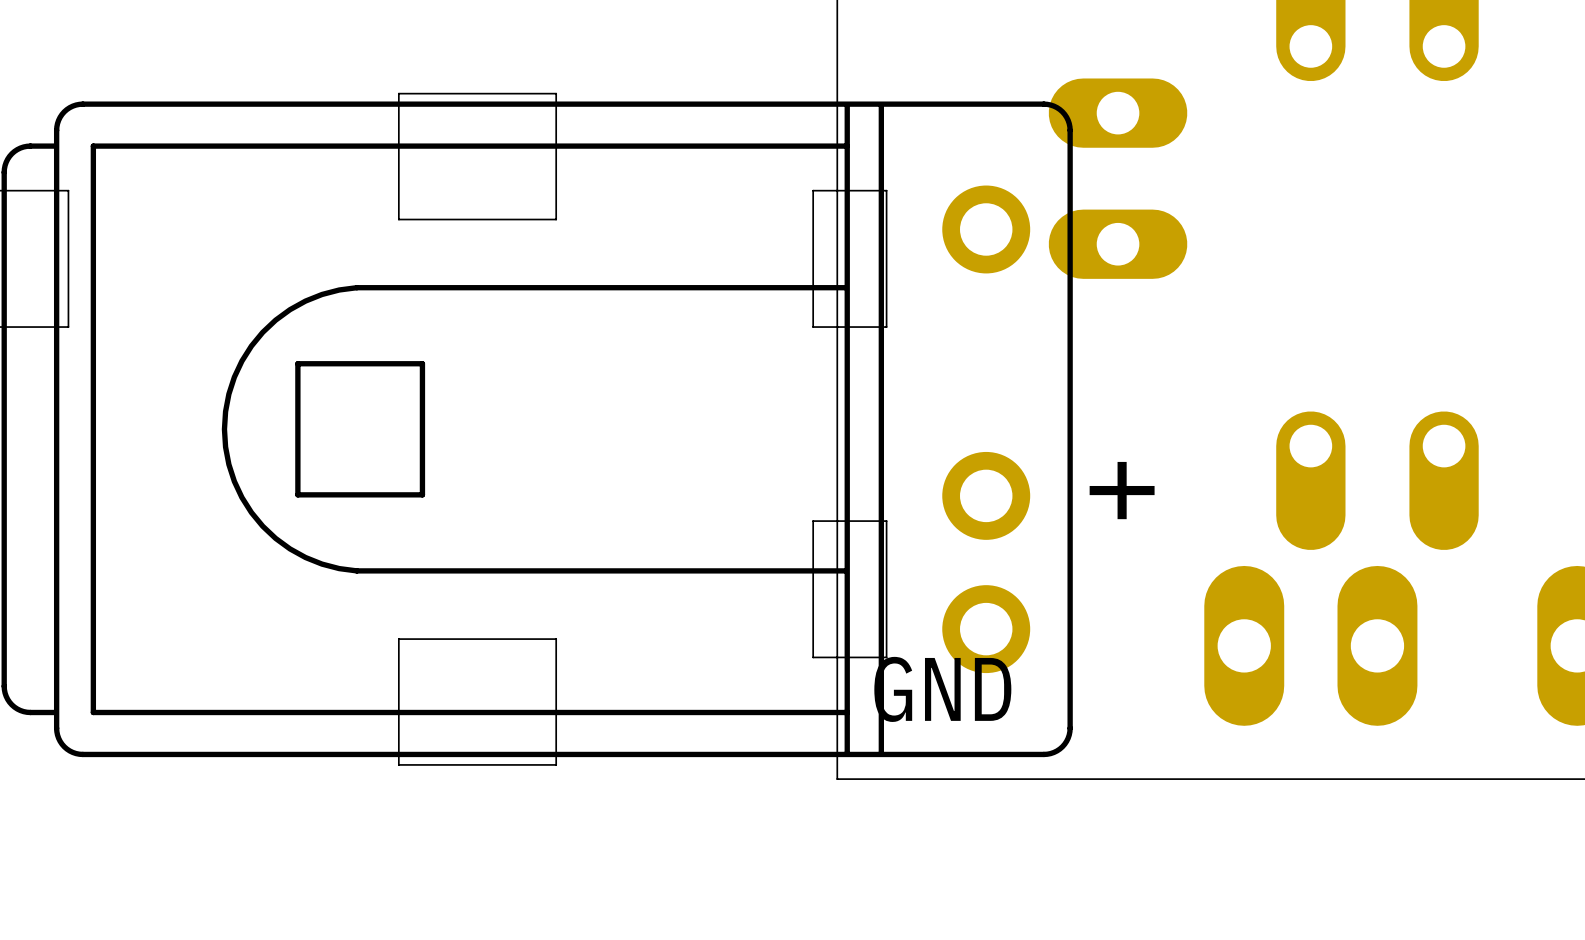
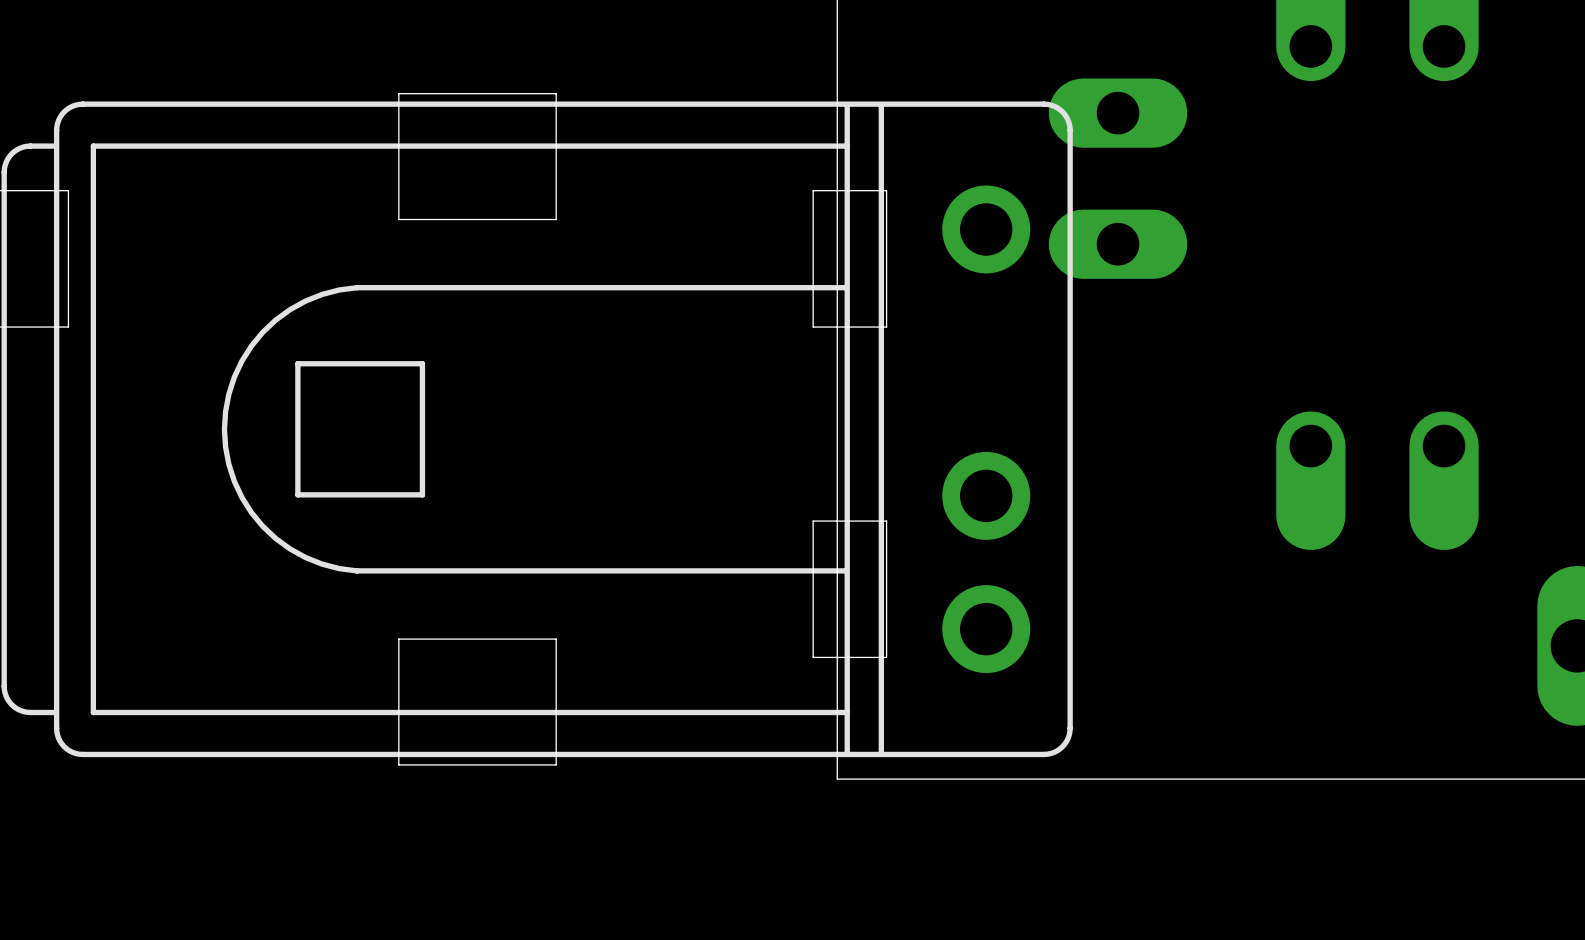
text: + (1122, 490) -> none
part: (1310, 645) -> none
text: GND (942, 689) -> none

